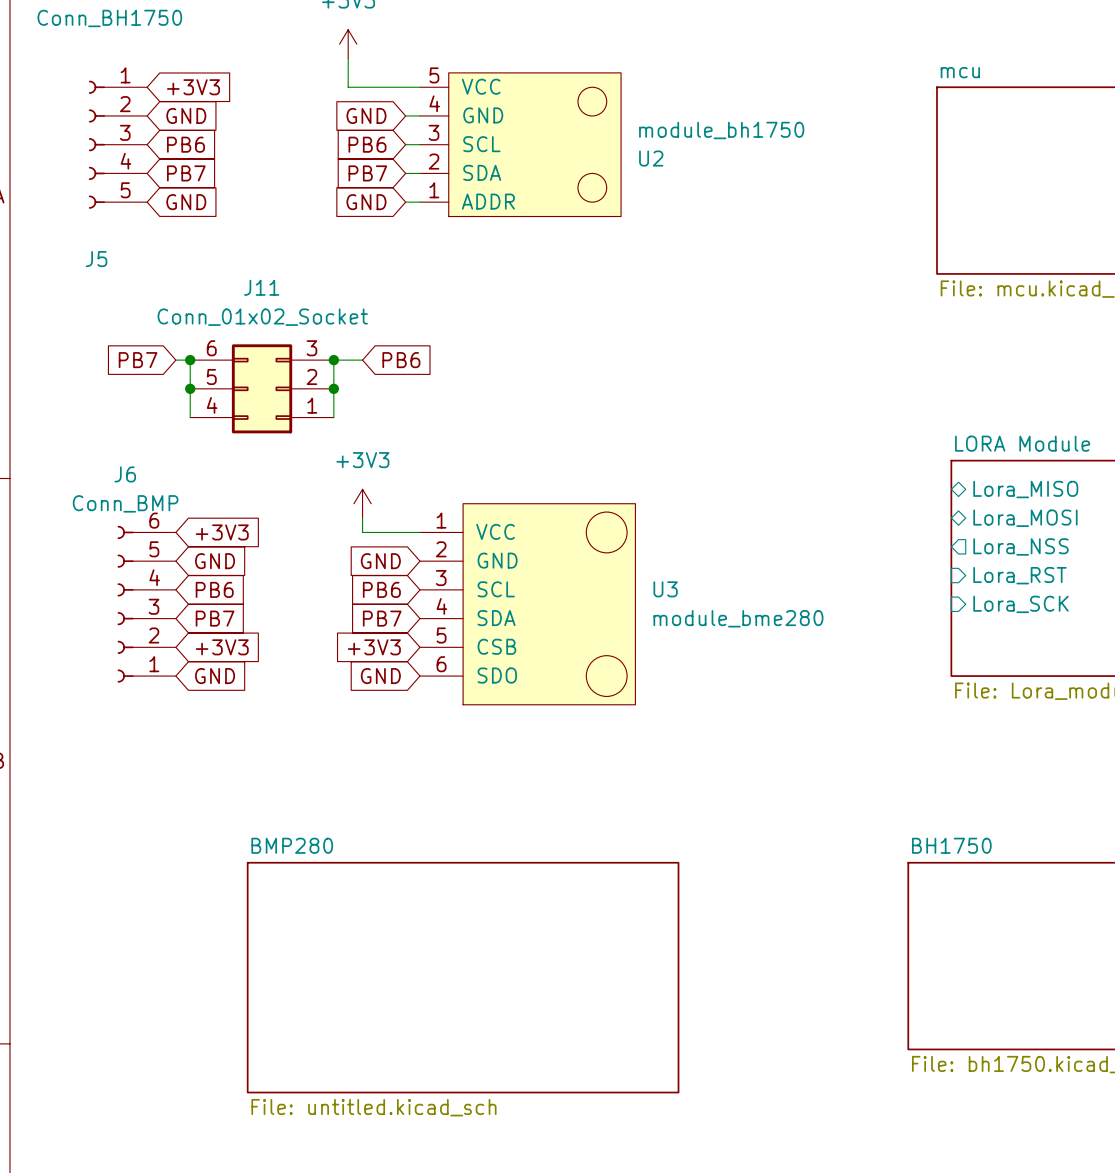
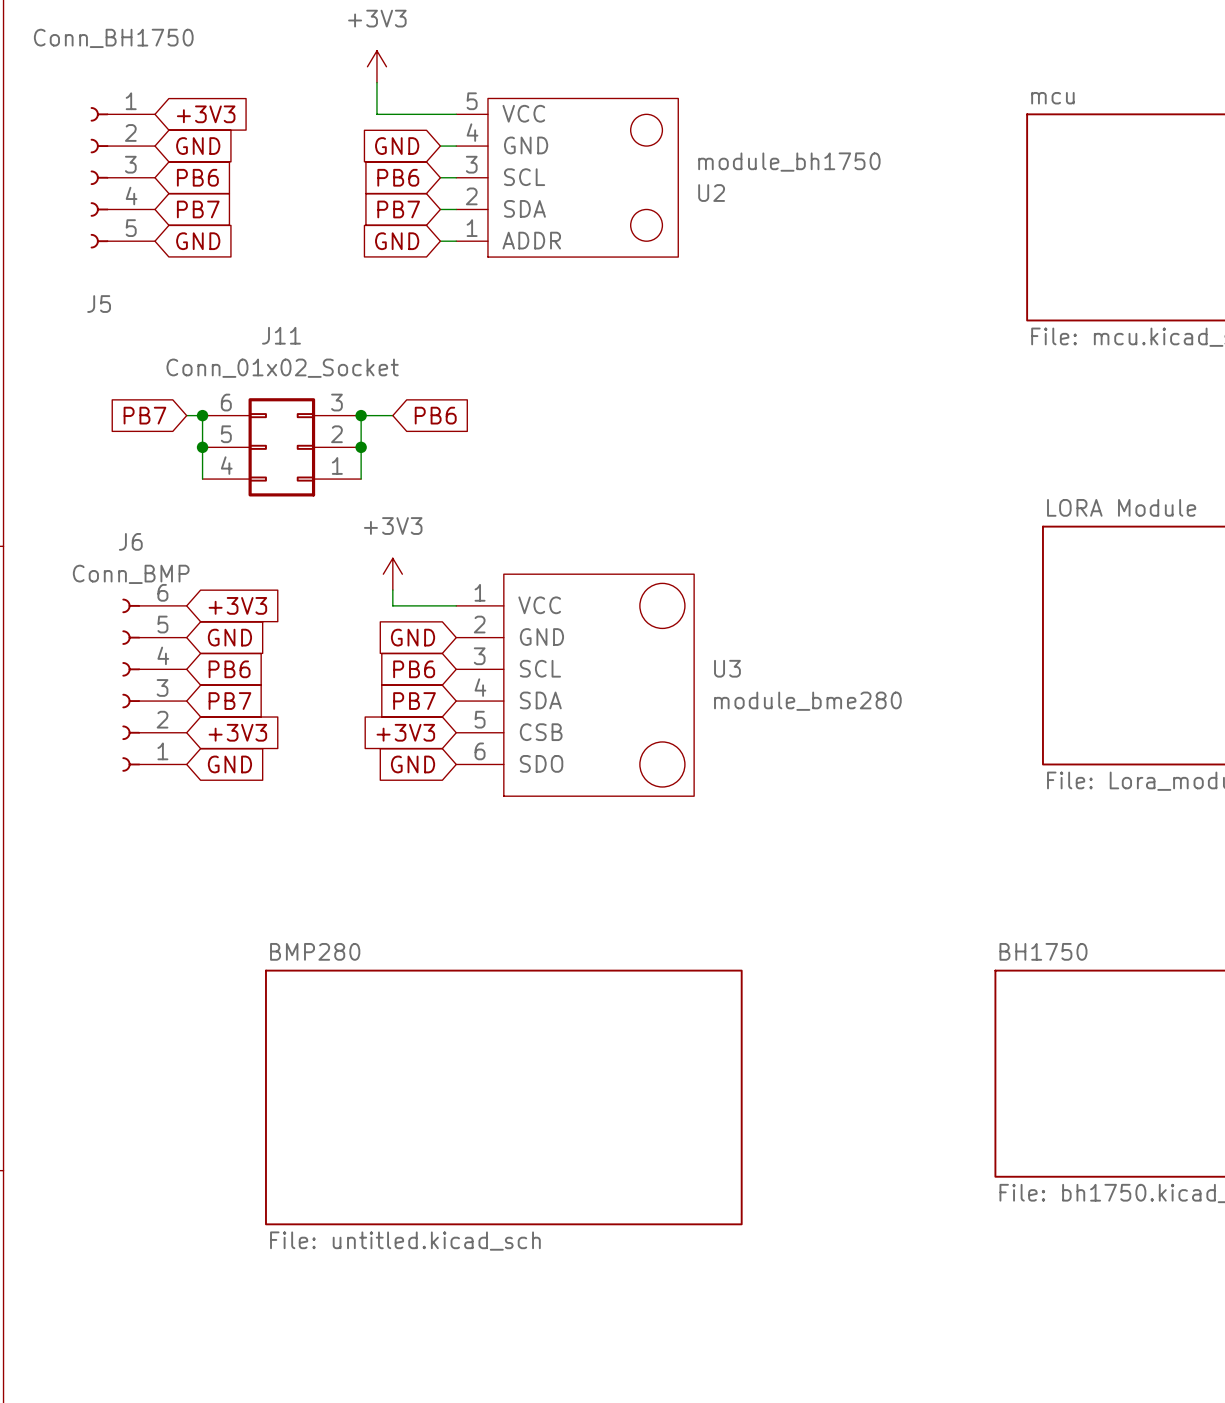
sheet pin: Lora_MISO (1025, 489) -> none
sheet pin: Lora_MOSI (1025, 518) -> none
sheet pin: Lora_NSS (1021, 546) -> none
sheet pin: Lora_RST (1019, 575) -> none
sheet pin: Lora_SCK (1021, 604) -> none

